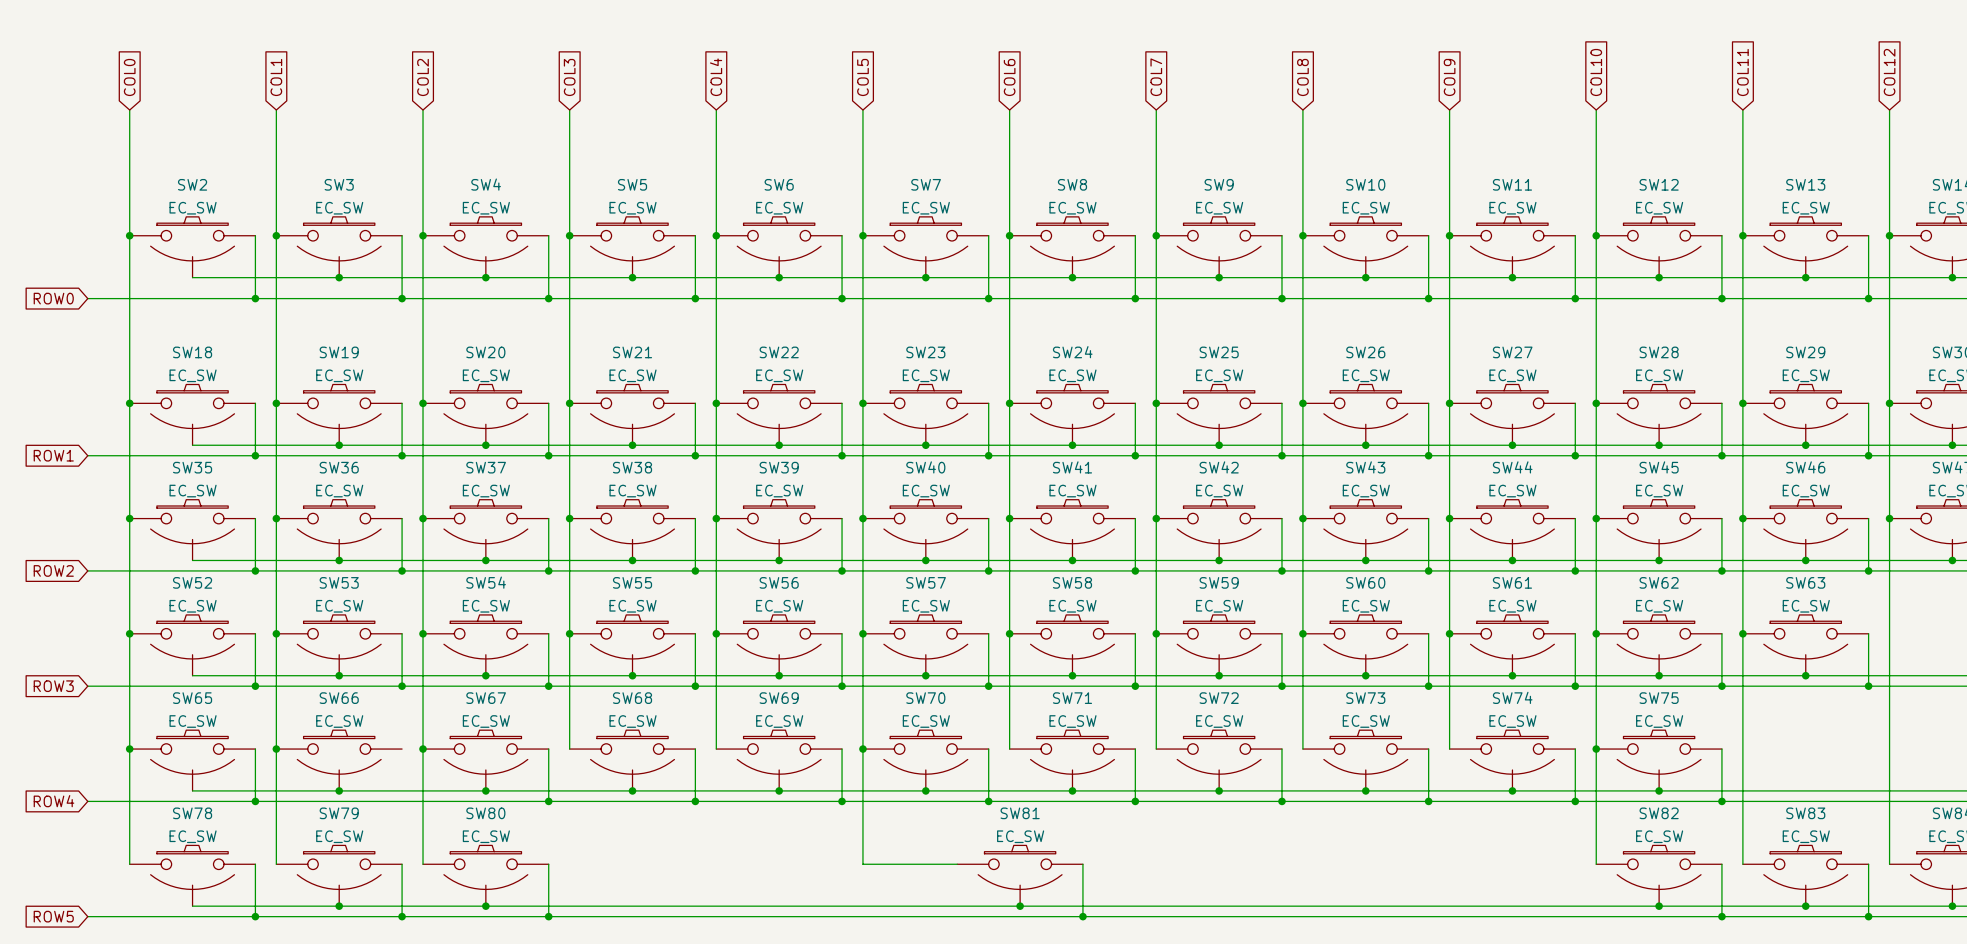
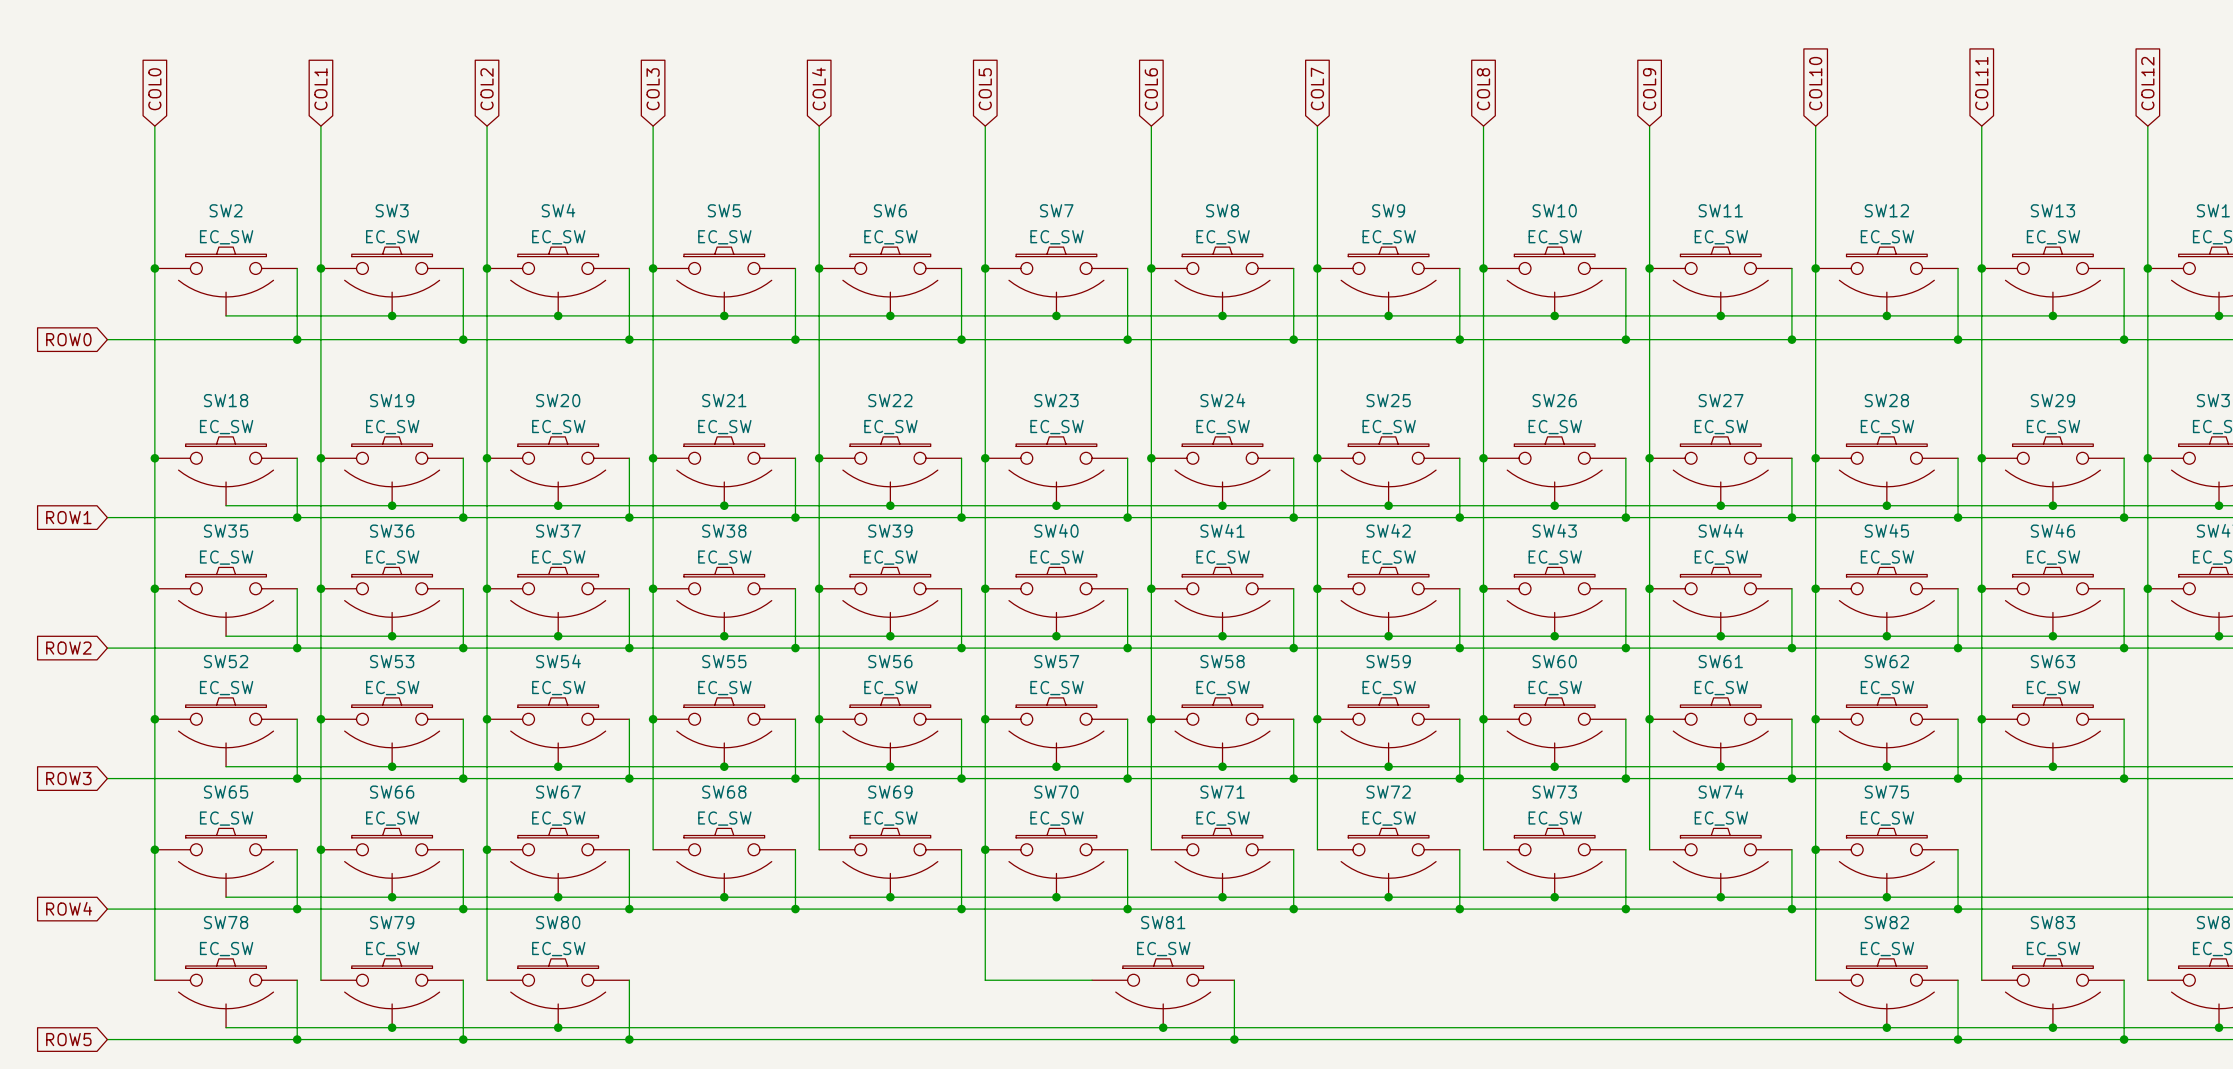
wire: none -> (463, 849) (463, 909)
junction: none -> (463, 909)

